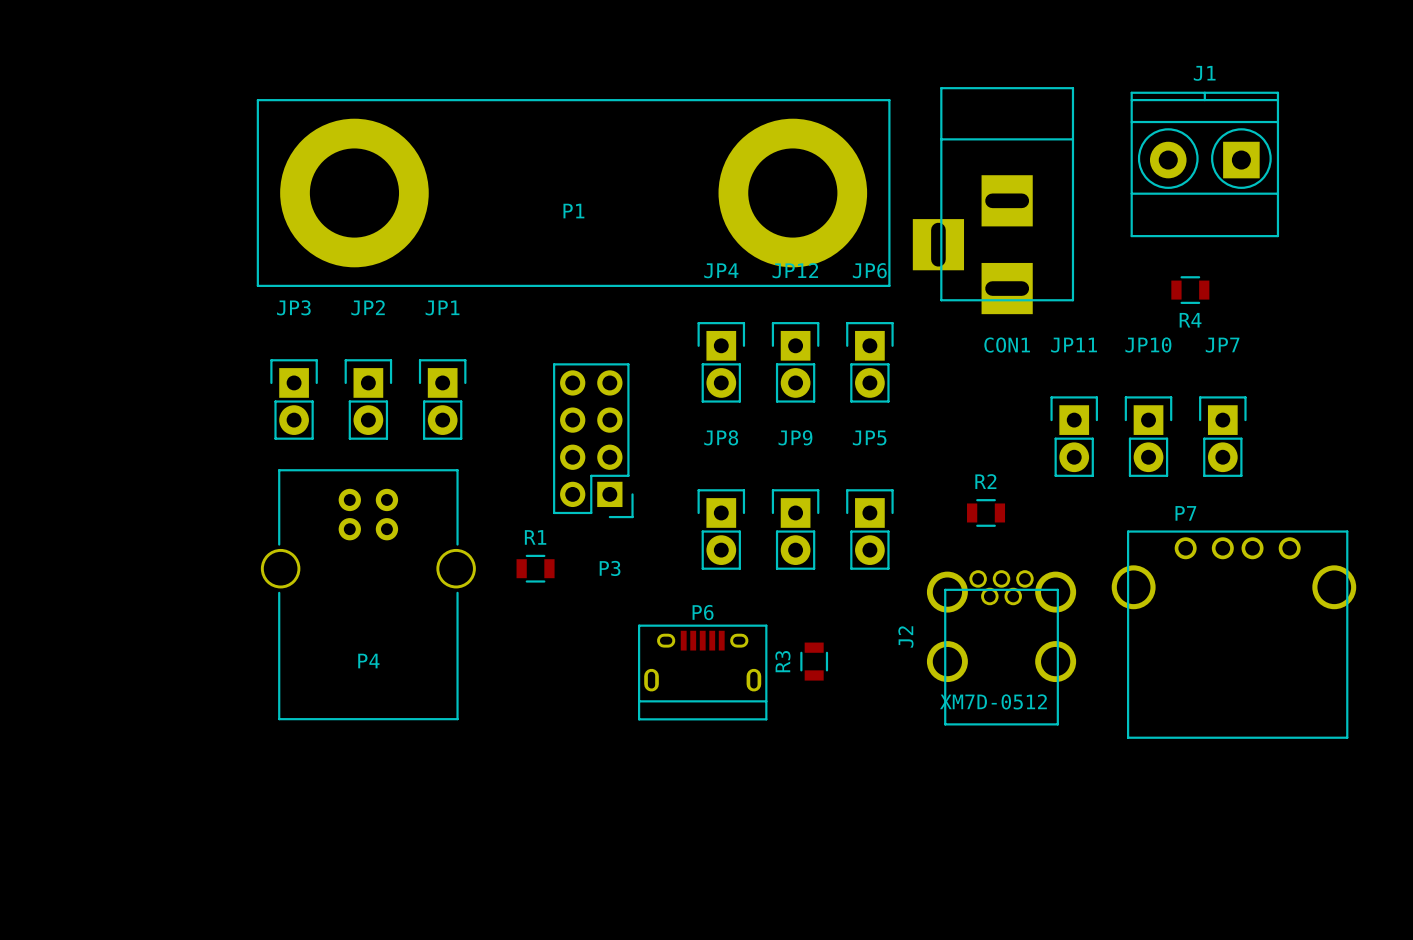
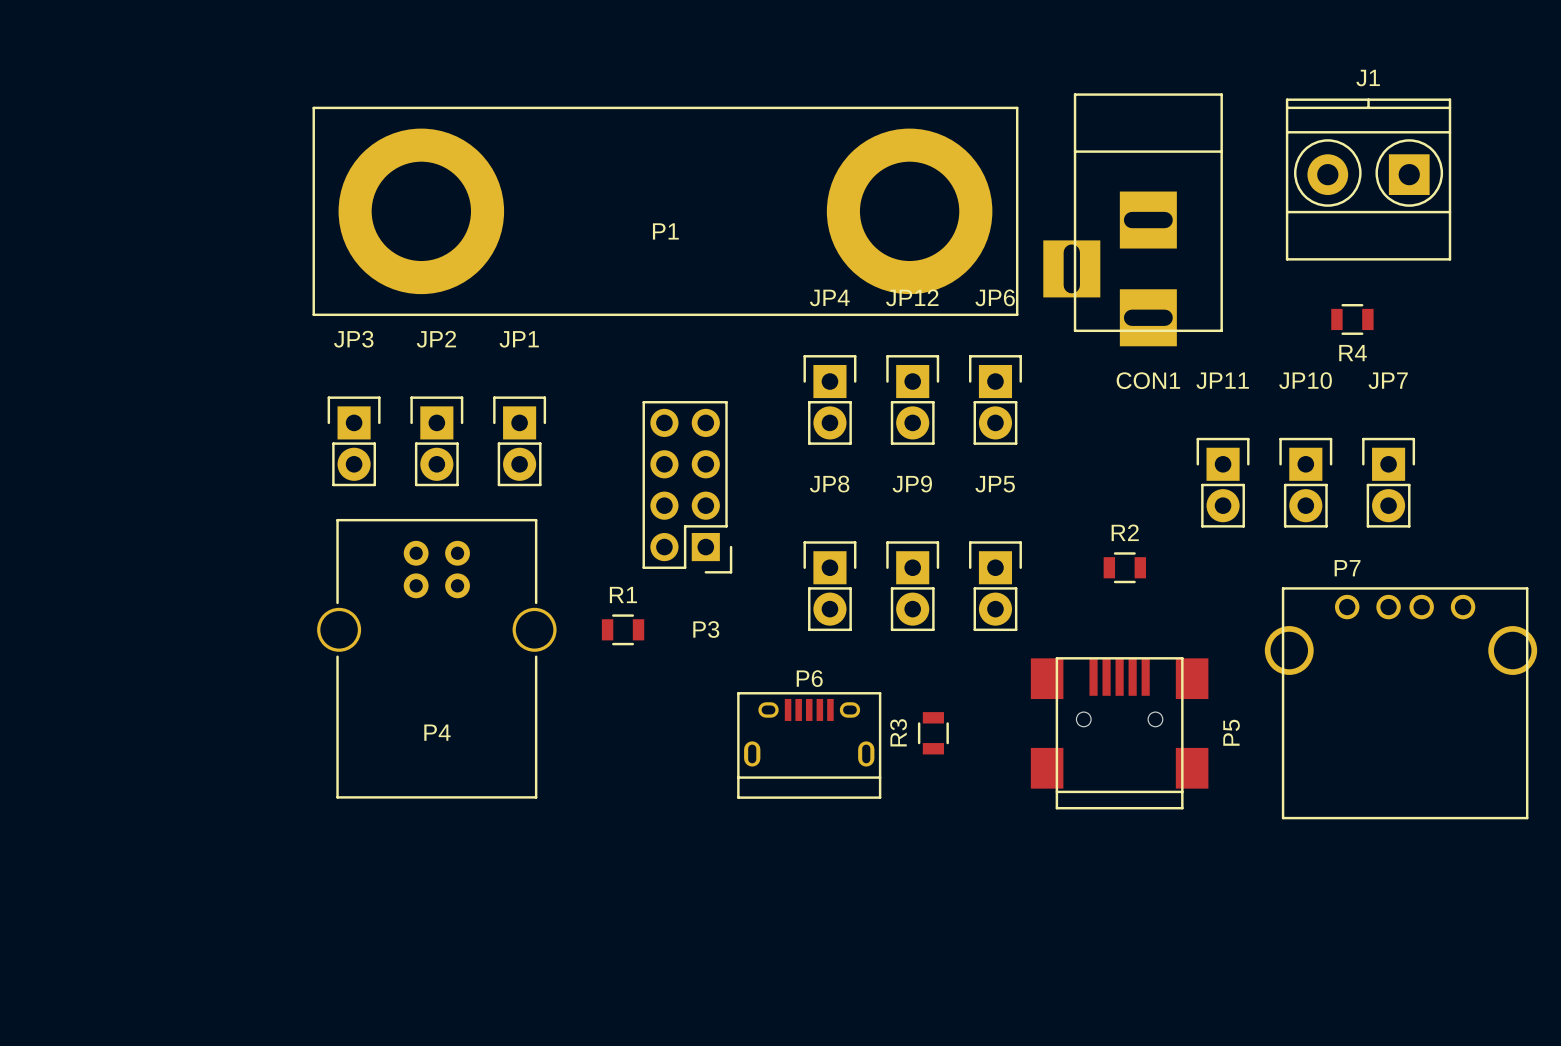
J2: XM7D-0512 (1001, 647) -> none
P5: none -> (1119, 733)

